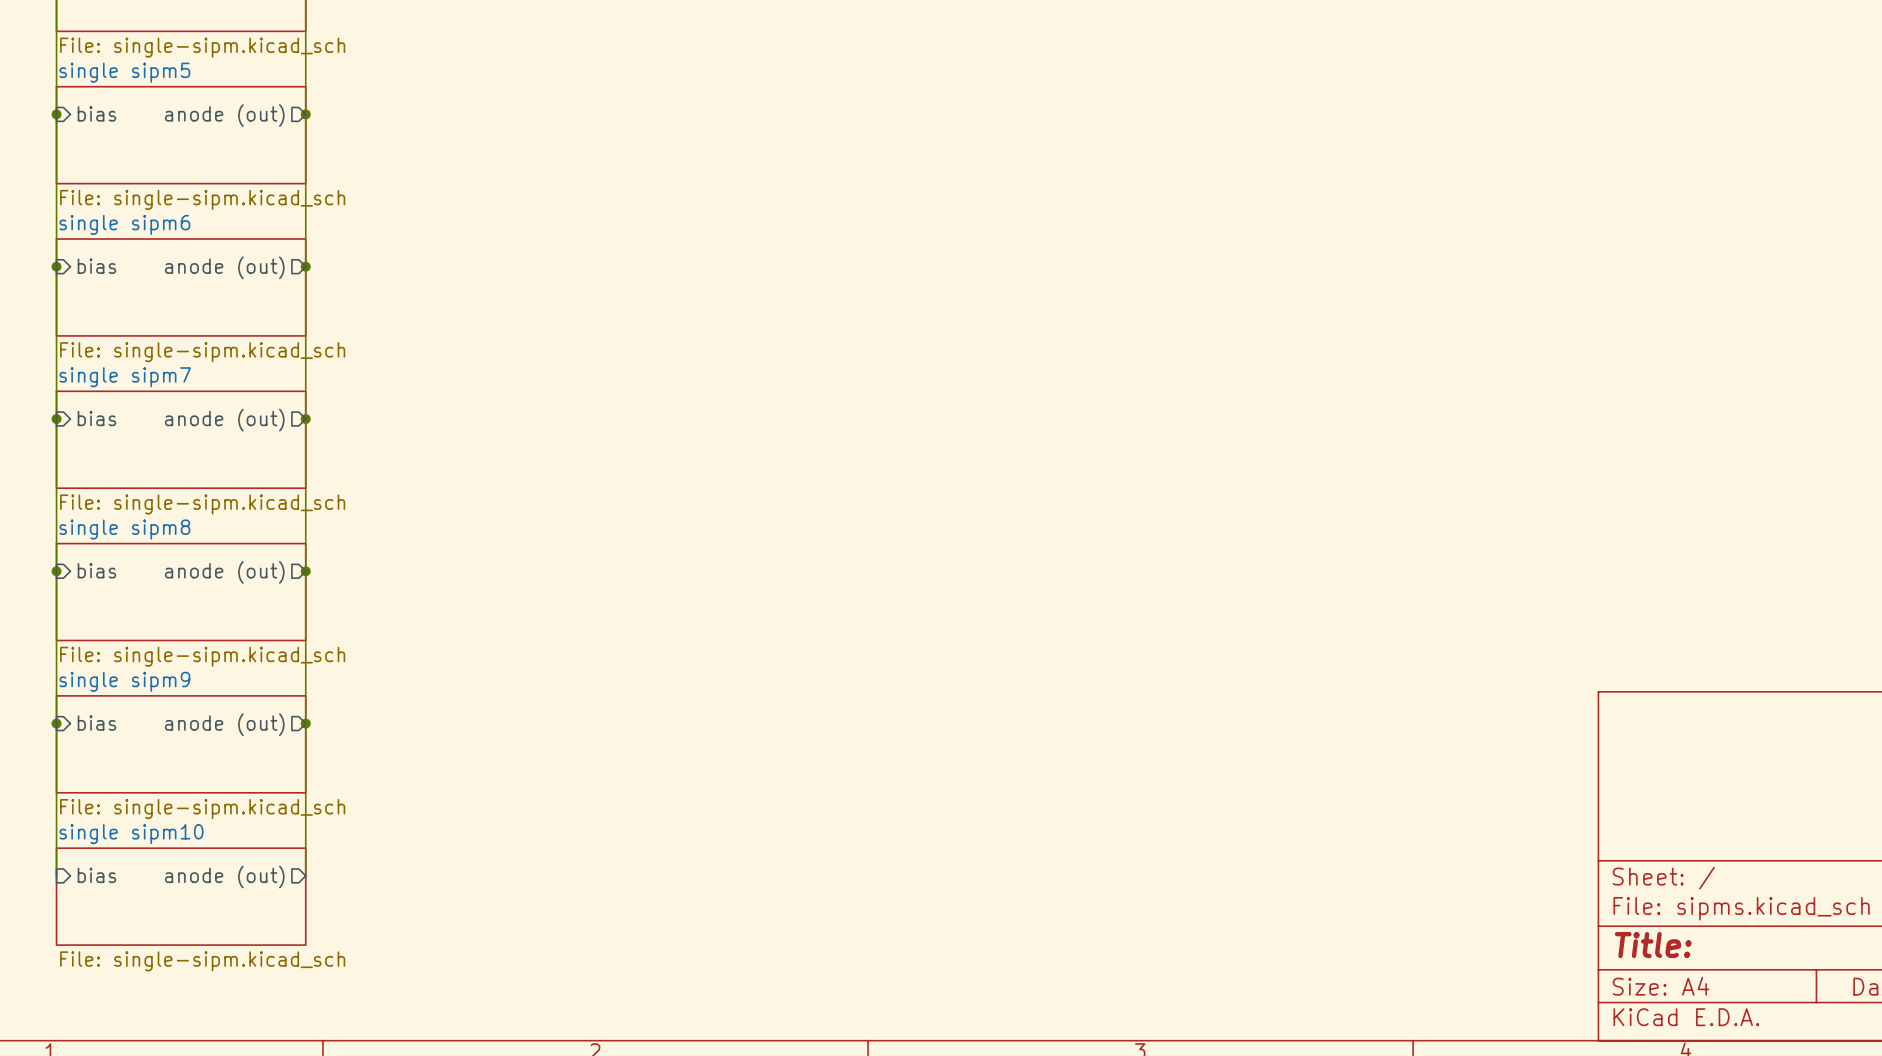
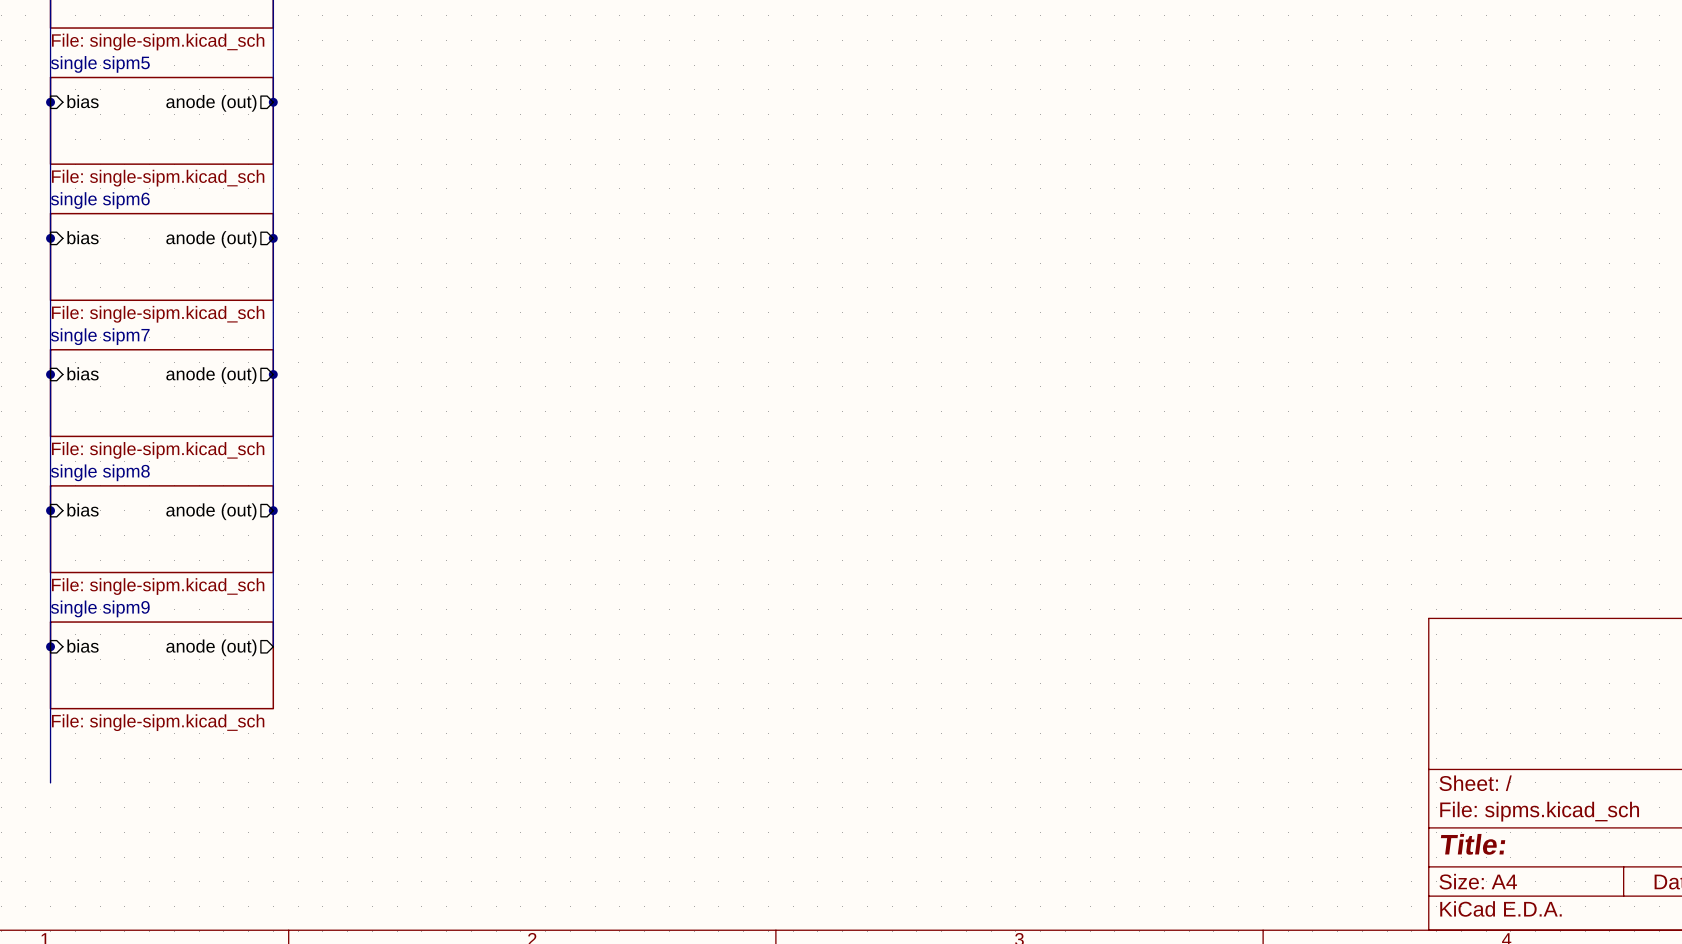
wire: (305, 723) (305, 875) -> none
junction: (305, 723) -> none
sheet pin: bias (96, 875) -> none
sheet pin: anode (out) (224, 877) -> none
sheet single sipm10: File: single-sipm.kicad_sch (181, 896) -> none

